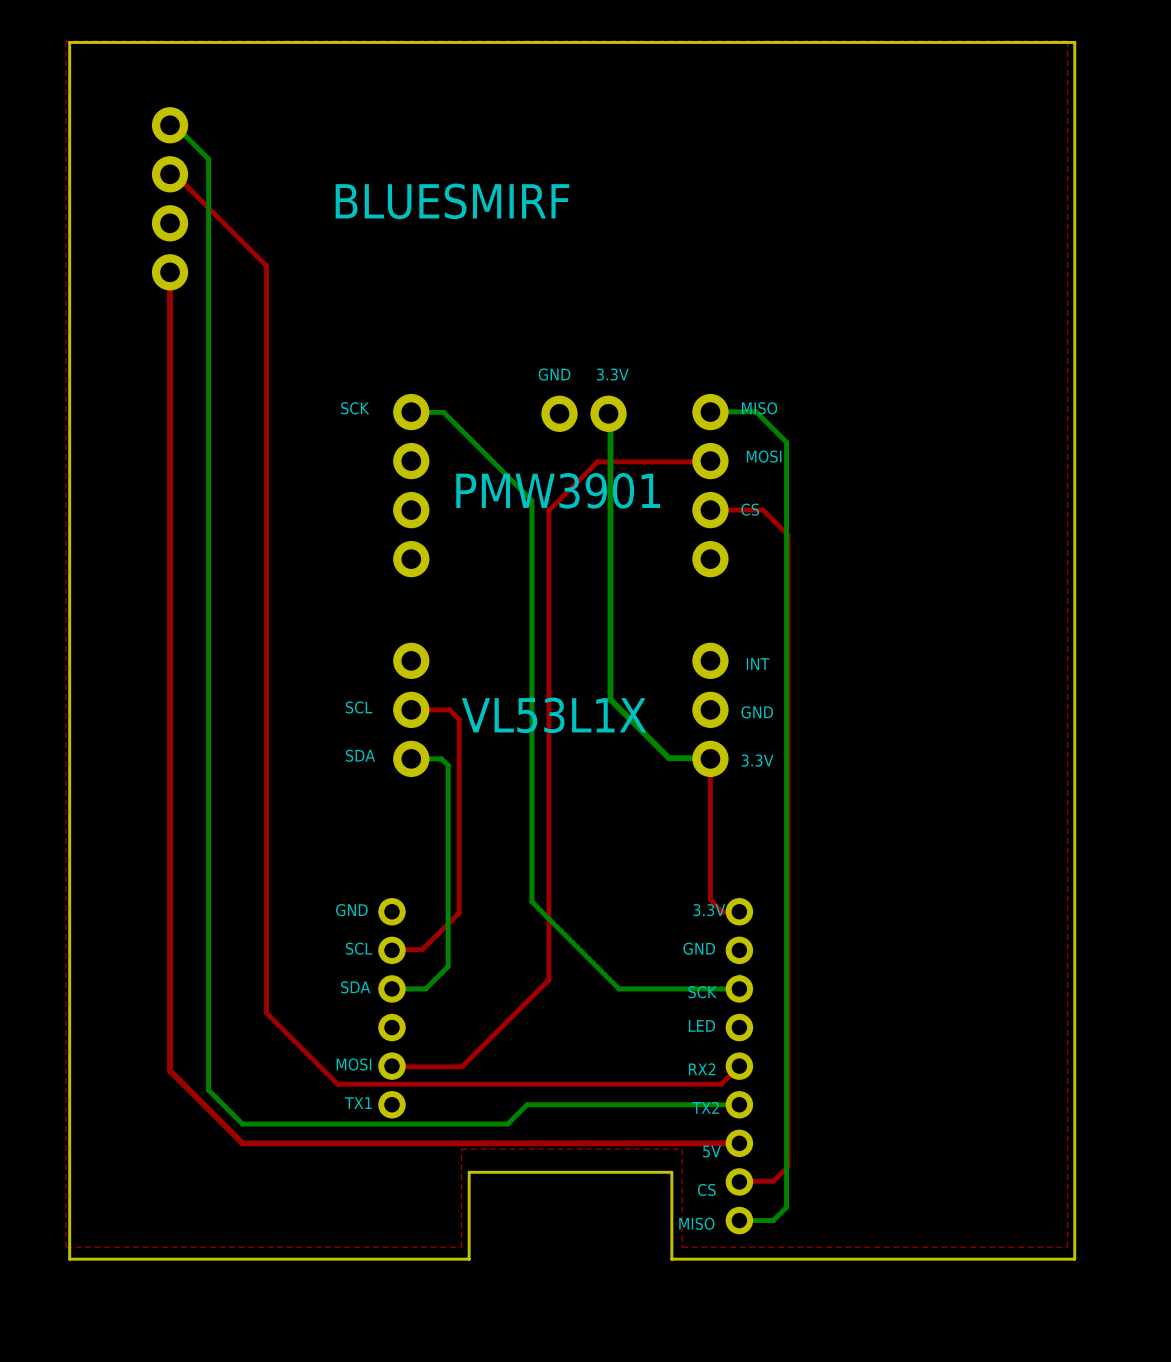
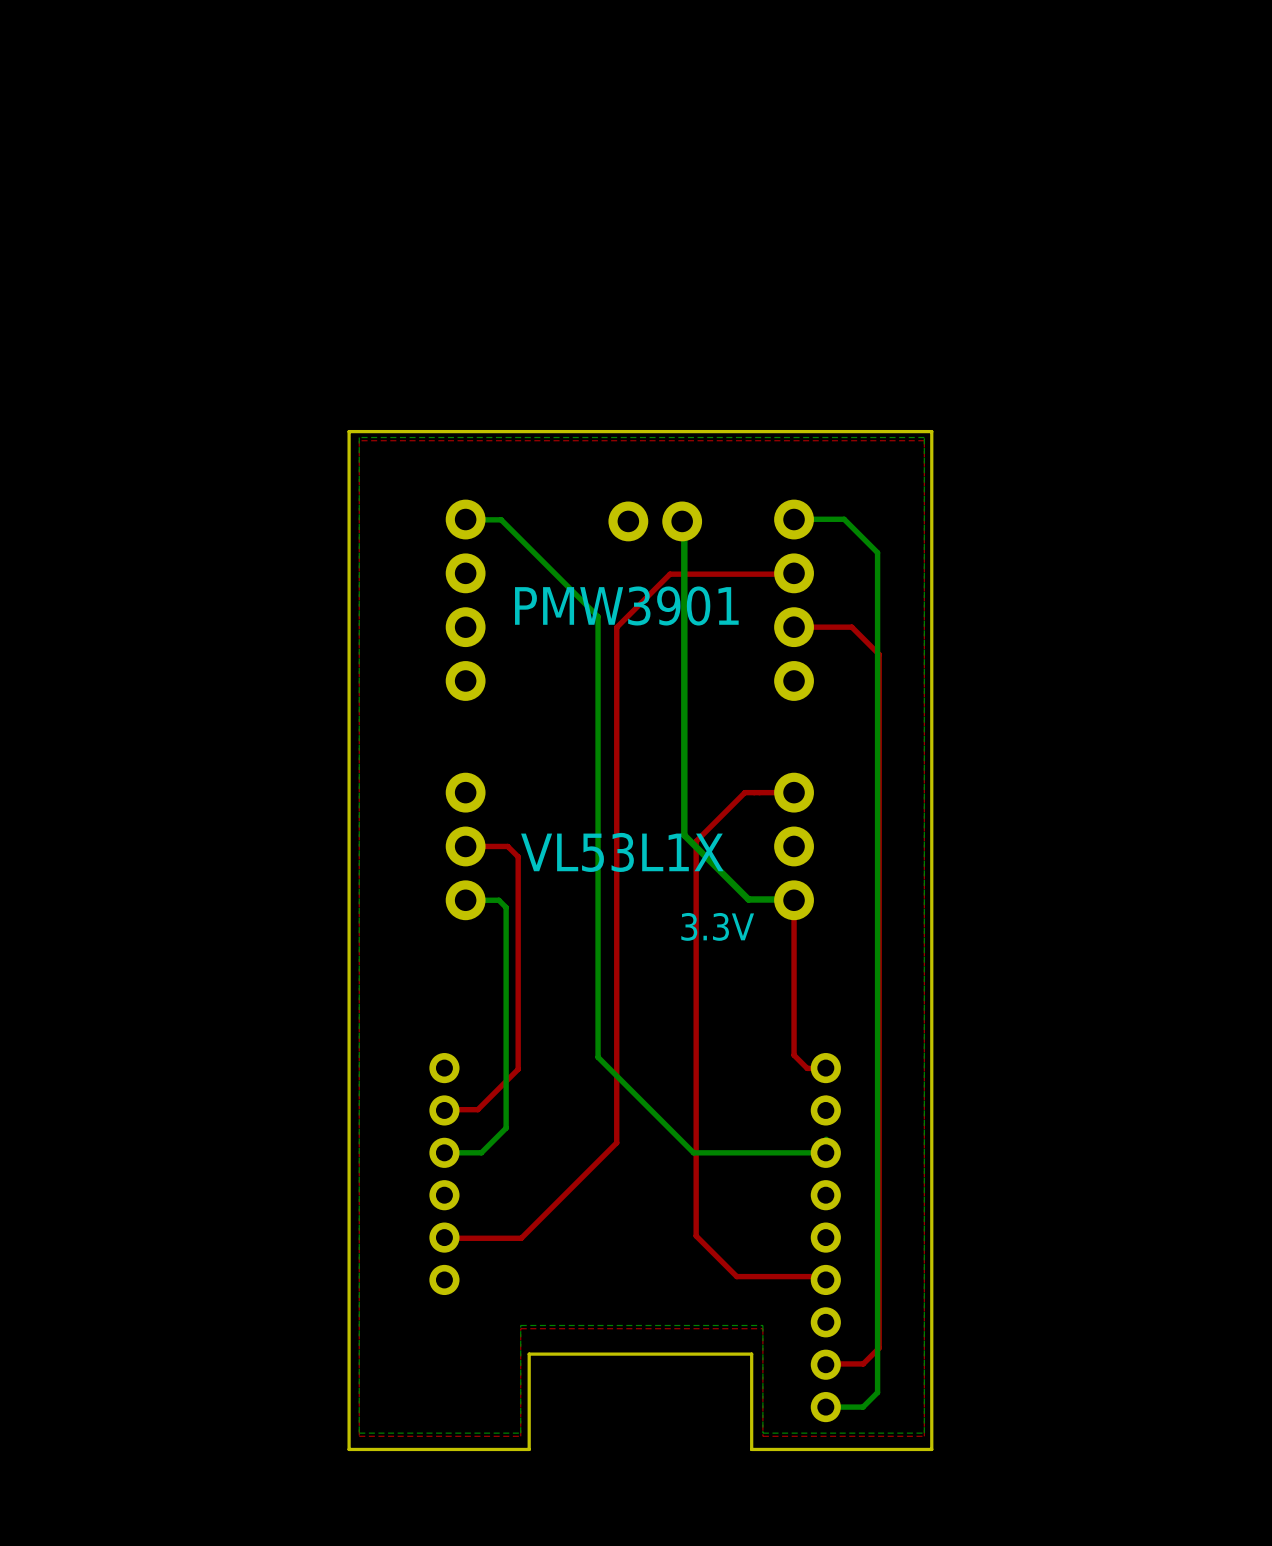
bottom track: (170, 125) (174, 125) (208, 159) (208, 1090) (242, 1124) (507, 1124) (527, 1104) (739, 1104) -> none
top track: (170, 174) (174, 174) (266, 265) (266, 1013) (337, 1084) (721, 1084) (739, 1066) -> none
part: (170, 198) -> none
text: BLUESMIRF (452, 201) -> none
top track: (170, 272) (170, 1070) (242, 1143) (729, 1143) -> none
bottom zone outline: none -> (924, 437) (359, 437) (359, 1433) (520, 1433) (520, 1325) (762, 1325) (762, 1433) (924, 1433) (924, 437)
text: GND (554, 374) -> none
text: 3.3V (612, 374) -> none
text: SCK (355, 408) -> none
text: MISO (759, 408) -> none
text: MOSI (764, 456) -> none
text: CS (750, 509) -> none
top track: none -> (793, 793) (744, 792) (696, 841) (696, 1235) (736, 1276) (822, 1276) (825, 1279)
text: INT (758, 664) -> none
text: SCL (359, 707) -> none
text: GND (757, 712) -> none
text: SDA (360, 755) -> none
text: 3.3V (757, 760) -> none
text: none -> 3.3V (717, 926)
text: GND (351, 910) -> none
text: 3.3V (709, 910) -> none
text: SCL (359, 948) -> none
text: GND (699, 948) -> none
text: SDA (355, 987) -> none
text: SCK (702, 992) -> none
text: LED (701, 1025) -> none
text: MOSI (353, 1064) -> none
text: RX2 (702, 1069) -> none
text: TX1 (358, 1103) -> none
text: TX2 (705, 1107) -> none
text: 5V (712, 1151) -> none
text: CS (706, 1189) -> none
text: MISO (696, 1223) -> none
top zone outline: (829, 1247) (1067, 1247) (1067, 41) (65, 41) (65, 1247) (314, 1247) -> (924, 1436) (924, 440) (359, 440) (359, 1436)
board edge: (835, 1259) (1074, 1259) (1074, 42) (69, 42) (69, 1259) (305, 1259) -> (931, 1449) (931, 431) (349, 431) (349, 1449)

